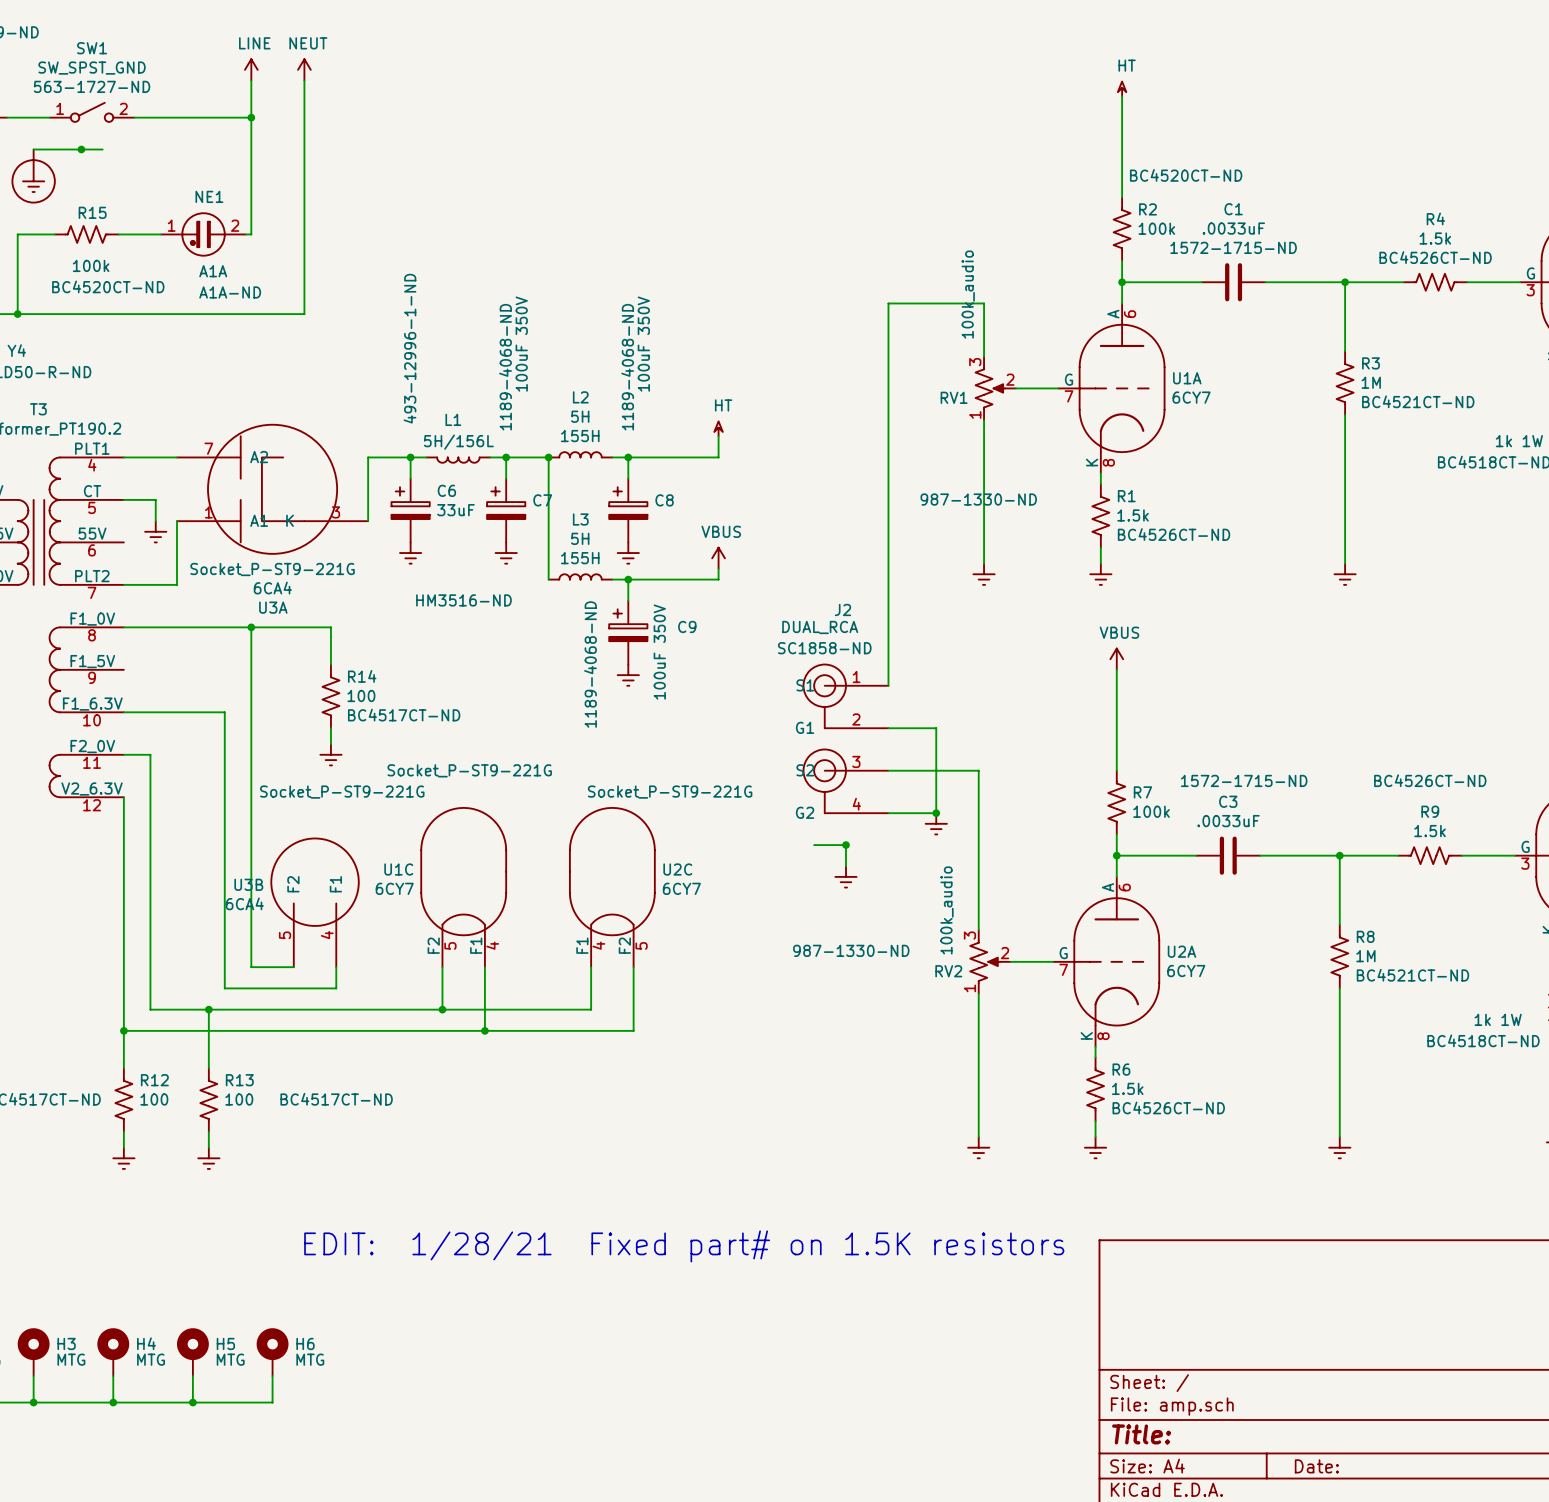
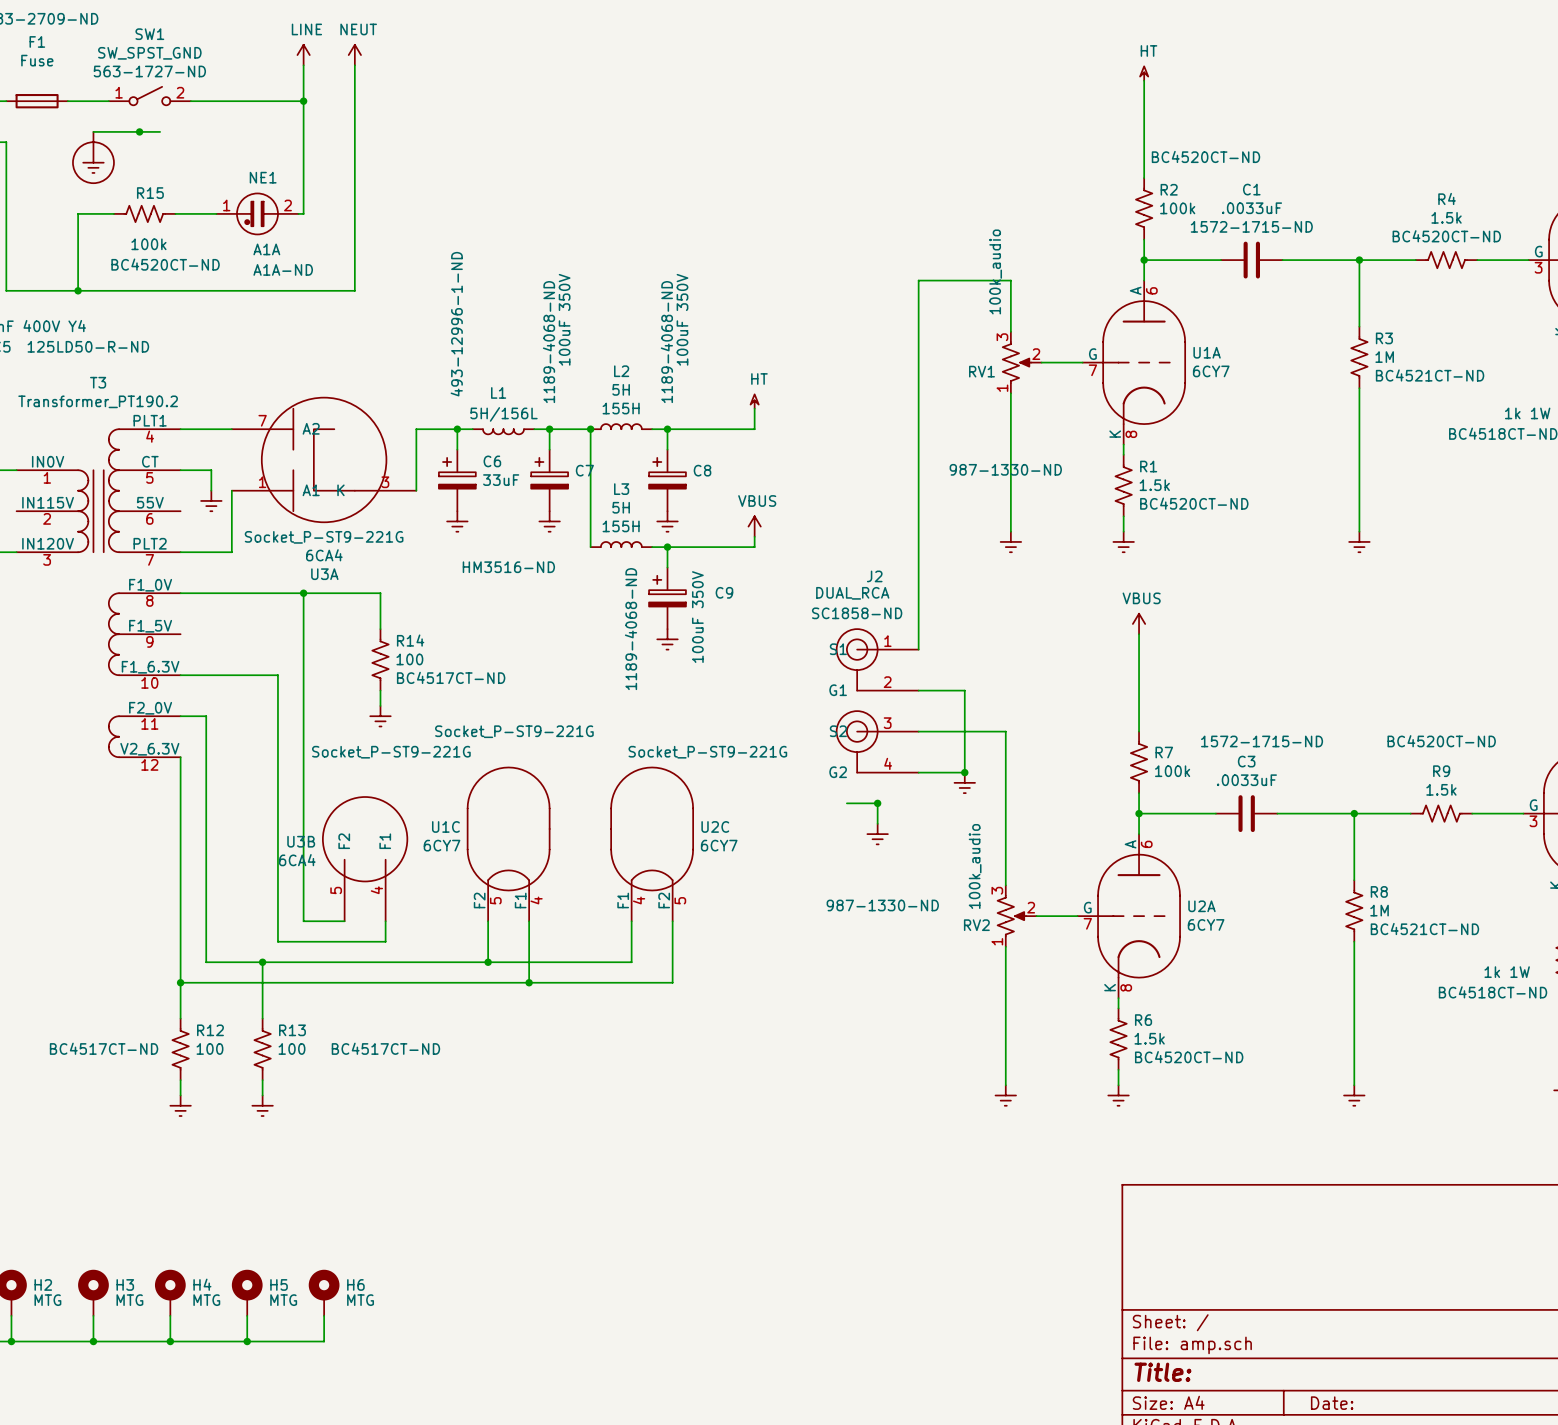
R4 text: BC4526CT-ND (1435, 257) -> BC4520CT-ND (1446, 236)
R1 text: BC4526CT-ND (1174, 534) -> BC4520CT-ND (1194, 503)
R9 text: BC4526CT-ND (1430, 780) -> BC4520CT-ND (1441, 741)
R6 text: BC4526CT-ND (1168, 1107) -> BC4520CT-ND (1189, 1057)
text: EDIT: 1/28/21 Fixed part# on 1.5K resistors (684, 1246) -> none

